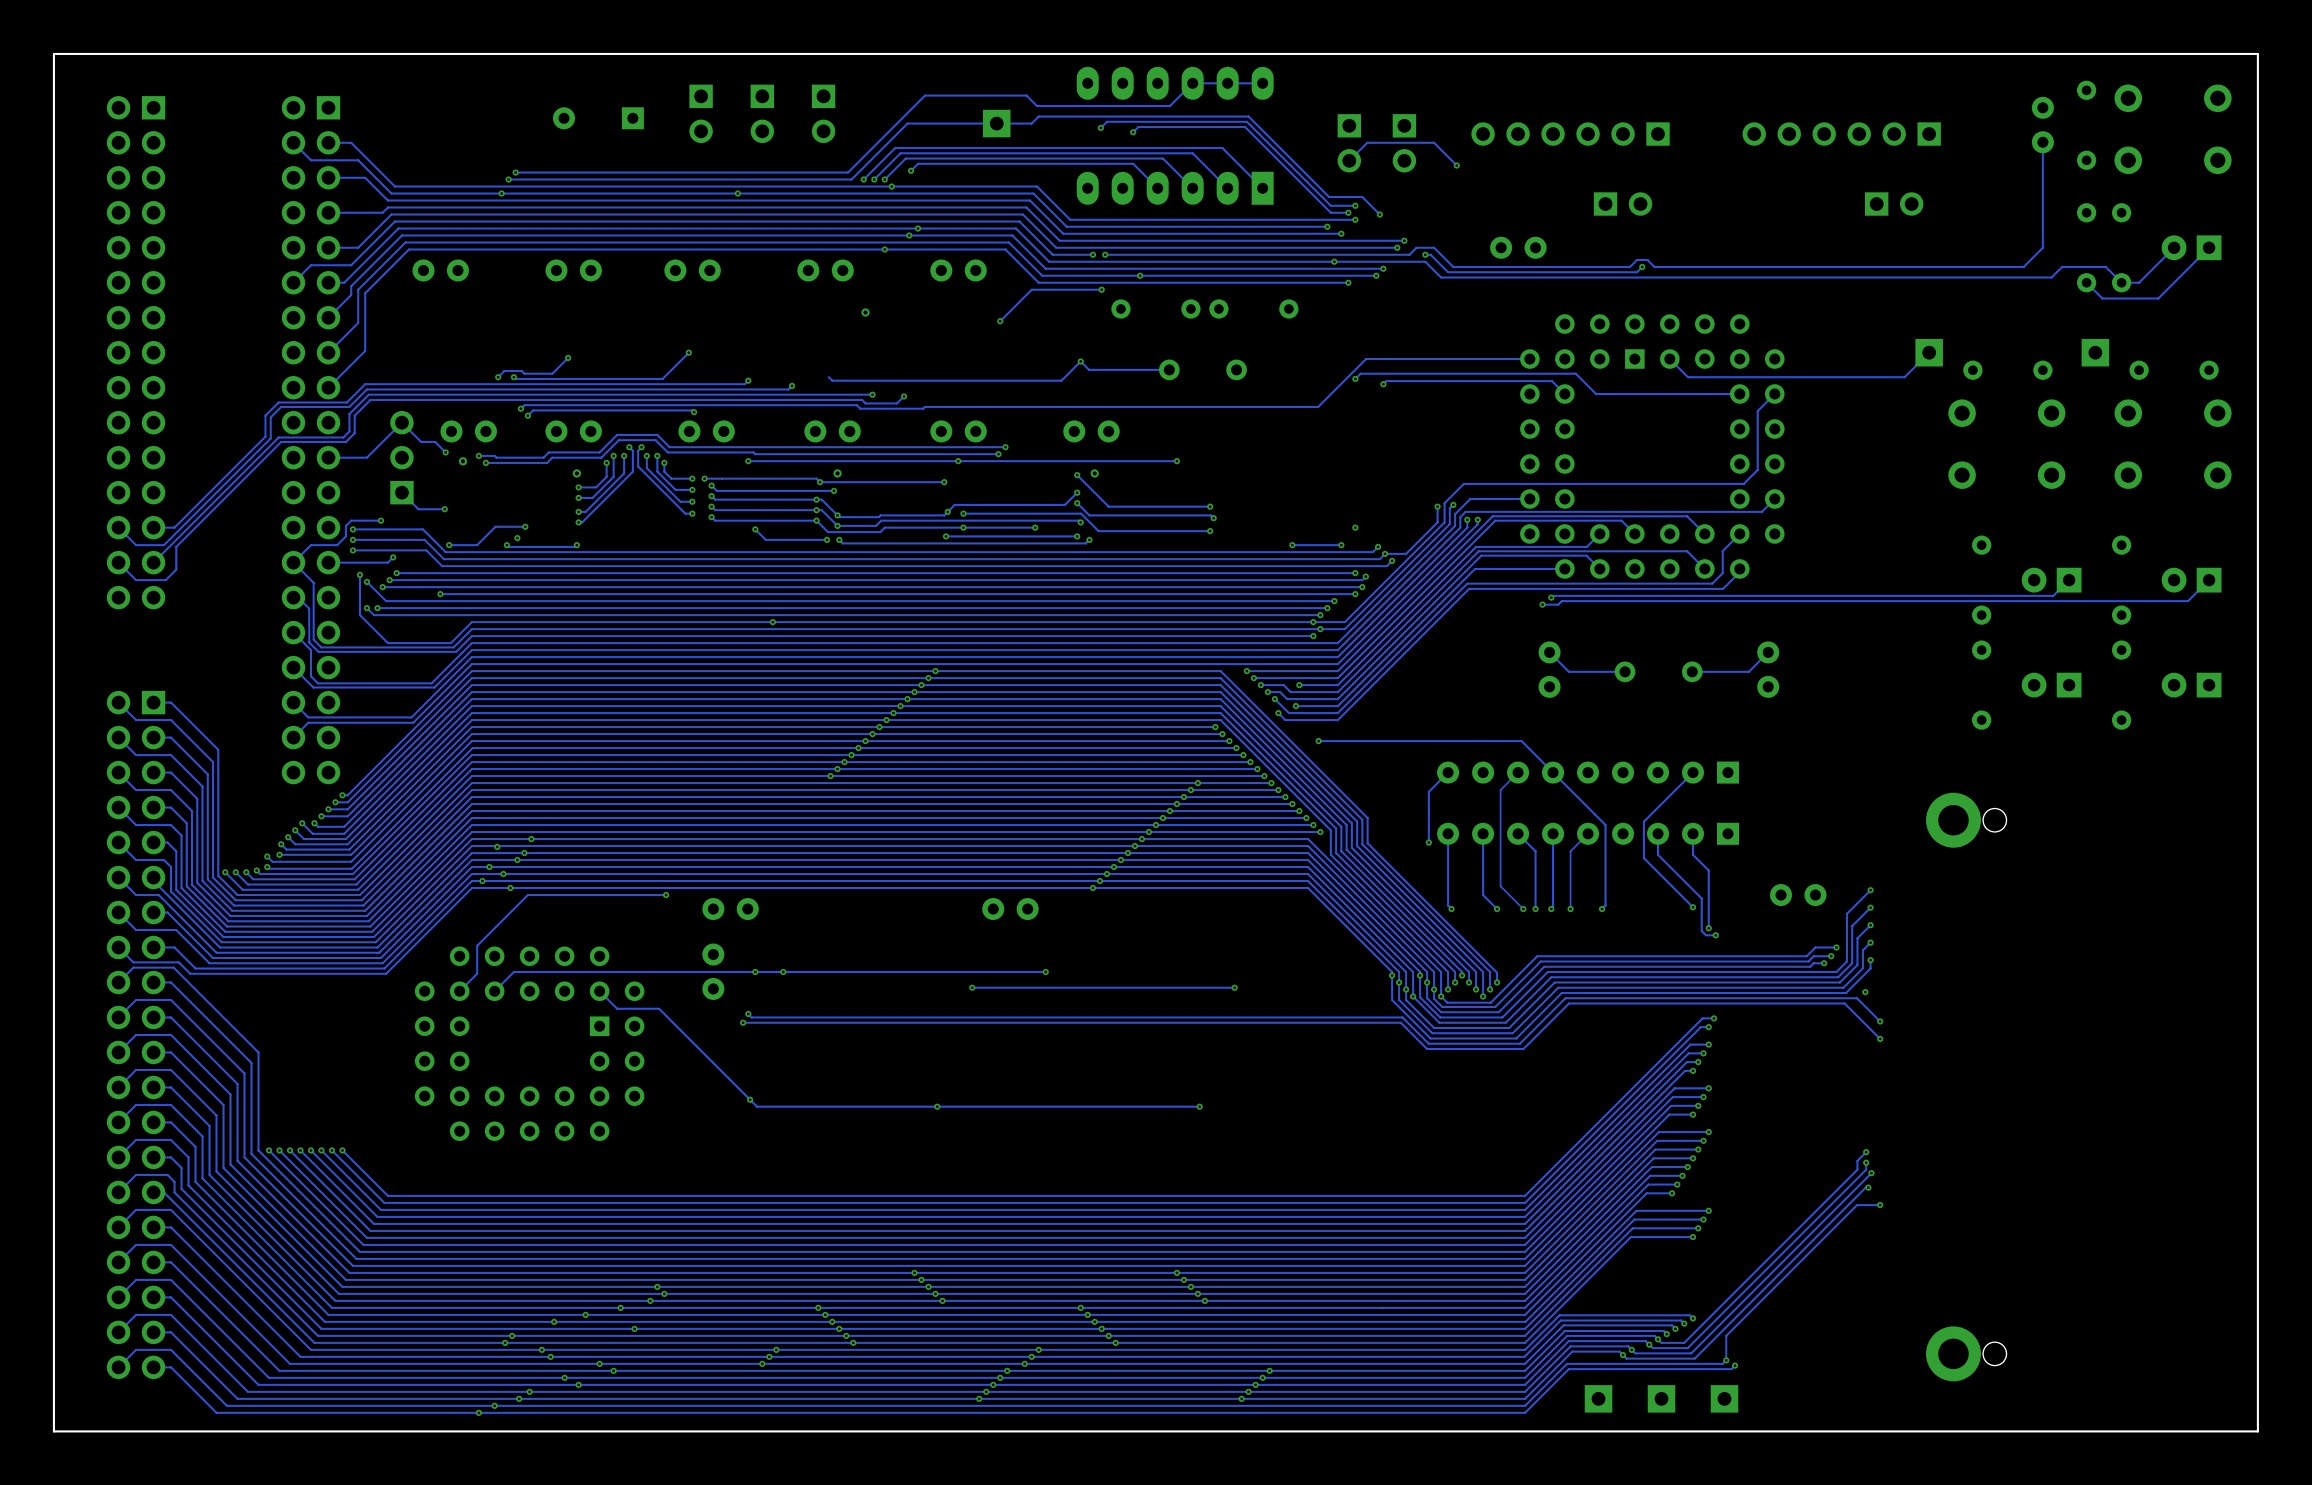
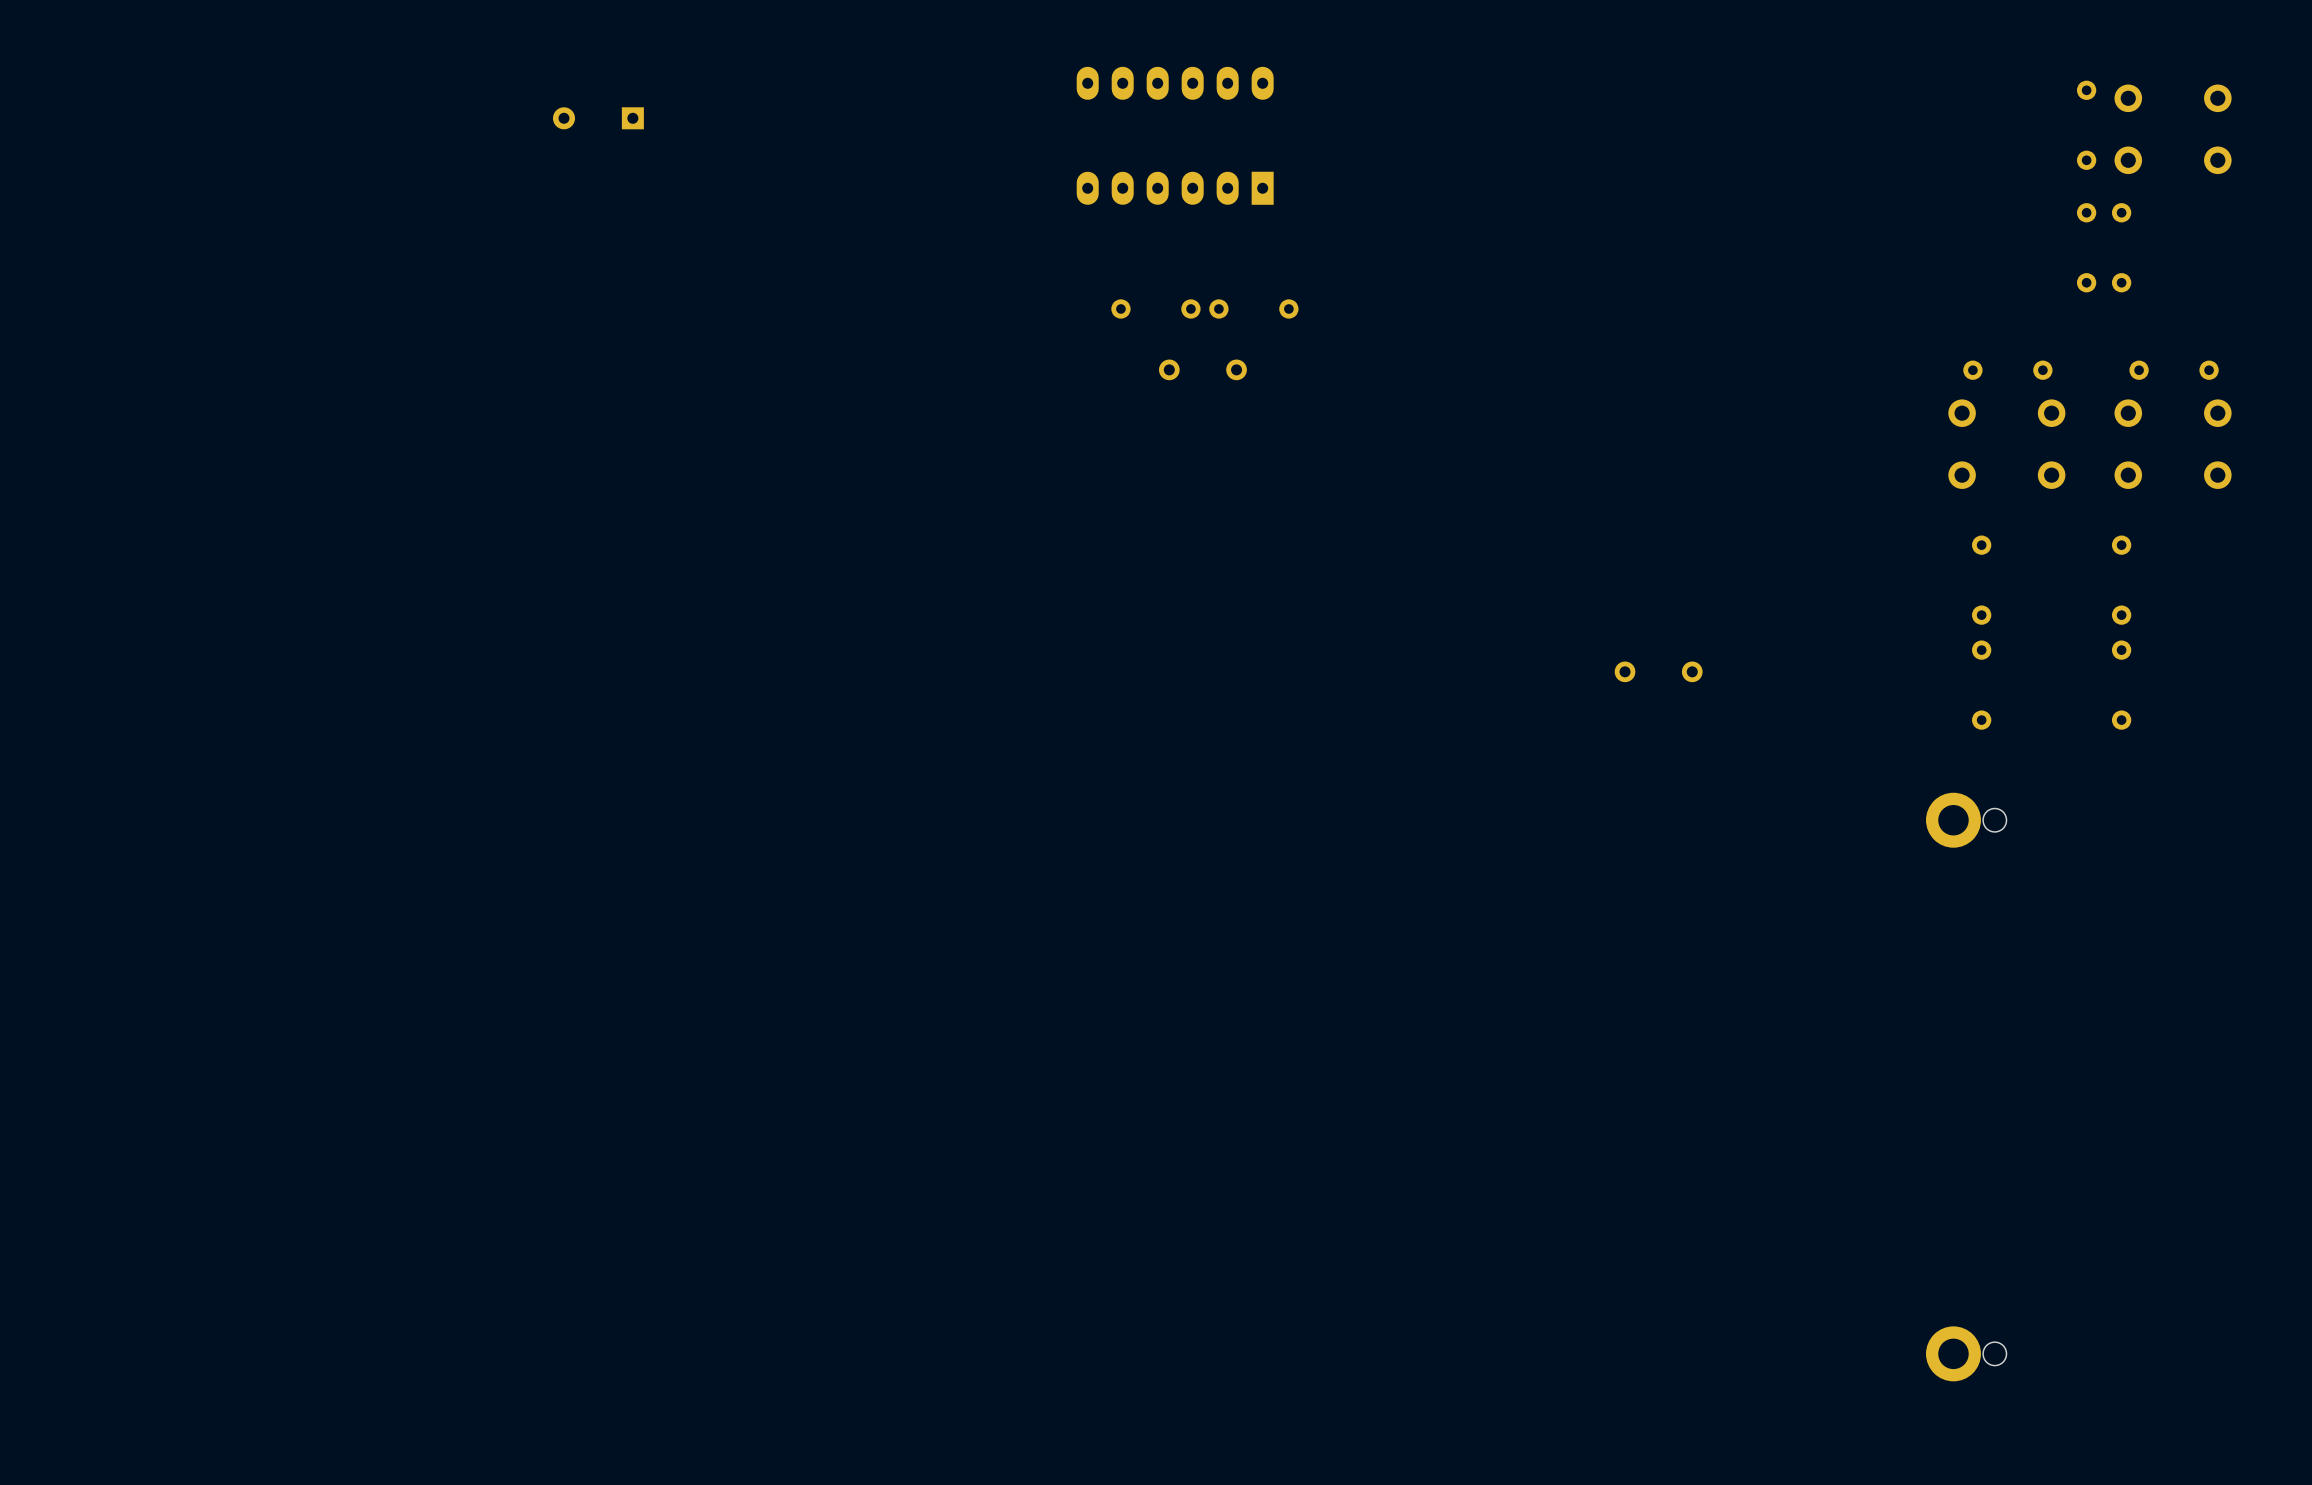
board edge: (2257, 53) (2257, 1431) (53, 1431) (53, 53) (2257, 53) -> none
track: (1262, 83) (1192, 83) (1169, 106) (1036, 106) (1026, 95) (925, 95) (848, 172) (515, 172) -> none
part: (701, 113) -> none
part: (762, 113) -> none
part: (823, 113) -> none
part: (996, 123) -> none
part: (2042, 125) -> none
track: (1100, 127) (1106, 121) (1246, 121) (1330, 205) (1355, 205) -> none
via: (1100, 127) -> none
track: (1133, 132) (1138, 127) (1245, 127) (1330, 212) (1348, 212) -> none
via: (1133, 132) -> none
part: (1570, 134) -> none
part: (1841, 134) -> none
track: (293, 142) (310, 160) (358, 160) (391, 193) (1033, 193) (1066, 226) (1327, 226) -> none
track: (328, 142) (351, 142) (394, 186) (1036, 186) (1070, 219) (1355, 219) -> none
track: (2042, 142) (2042, 247) (2023, 267) (1654, 267) (1647, 260) (1637, 260) (1630, 267) (1453, 267) (1434, 247) (1416, 247) (1409, 254) (1105, 254) -> none
part: (1349, 143) -> none
part: (1404, 143) -> none
track: (1349, 160) (1367, 142) (1434, 142) (1456, 165) -> none
via: (1456, 165) -> none
track: (911, 170) (918, 163) (1133, 163) (1157, 188) -> none
via: (911, 170) -> none
via: (515, 172) -> none
track: (328, 177) (365, 177) (387, 200) (1029, 200) (1063, 233) (1341, 233) -> none
track: (508, 179) (851, 179) (907, 123) (1031, 123) (1038, 116) (1248, 116) (1329, 197) (1362, 197) (1379, 214) -> none
via: (508, 179) -> none
track: (863, 179) (895, 148) (1222, 148) (1262, 188) -> none
via: (863, 179) -> none
track: (874, 179) (900, 153) (1192, 153) (1227, 188) -> none
via: (874, 179) -> none
track: (884, 179) (905, 158) (1162, 158) (1192, 188) -> none
via: (884, 179) -> none
via: (891, 186) -> none
via: (501, 193) -> none
via: (737, 193) -> none
part: (1623, 204) -> none
part: (1894, 204) -> none
via: (1355, 205) -> none
track: (328, 212) (382, 212) (387, 207) (1026, 207) (1059, 240) (1404, 240) -> none
via: (1348, 212) -> none
via: (1379, 214) -> none
via: (1355, 219) -> none
via: (1327, 226) -> none
via: (918, 228) -> none
via: (1341, 233) -> none
via: (909, 235) -> none
via: (1404, 240) -> none
track: (1397, 247) (1056, 247) (1022, 214) (391, 214) (358, 247) (328, 247) -> none
via: (1397, 247) -> none
part: (1518, 247) -> none
track: (2174, 247) (2139, 282) (2121, 282) (2105, 267) (2062, 267) (2051, 277) (1441, 277) (1425, 261) (1049, 261) (1015, 228) (398, 228) (344, 282) (328, 282) -> none
part: (2191, 247) -> none
track: (2209, 247) (2158, 298) (2102, 298) (2086, 282) -> none
via: (884, 249) -> none
track: (1092, 254) (1052, 254) (1019, 221) (394, 221) (351, 265) (310, 265) (293, 282) -> none
via: (1092, 254) -> none
via: (1105, 254) -> none
track: (1425, 254) (1430, 254) (1448, 272) (1637, 272) (1642, 267) -> none
via: (1425, 254) -> none
via: (1334, 261) -> none
via: (1642, 267) -> none
track: (1383, 268) (1045, 268) (1012, 235) (401, 235) (351, 286) (351, 294) (328, 317) -> none
via: (1383, 268) -> none
part: (440, 270) -> none
part: (573, 270) -> none
part: (692, 270) -> none
part: (825, 270) -> none
part: (958, 270) -> none
via: (1140, 275) -> none
track: (1376, 275) (1042, 275) (1008, 242) (405, 242) (358, 289) (358, 322) (328, 352) -> none
via: (1376, 275) -> none
track: (1348, 282) (1038, 282) (1005, 249) (408, 249) (365, 293) (365, 350) (328, 387) -> none
via: (1348, 282) -> none
track: (1101, 289) (1031, 289) (1000, 321) -> none
via: (1101, 289) -> none
via: (865, 312) -> none
via: (1000, 321) -> none
part: (136, 352) -> none
track: (688, 352) (662, 378) (515, 378) (513, 377) -> none
via: (688, 352) -> none
track: (1929, 352) (1904, 377) (1688, 377) (1669, 359) -> none
part: (1929, 352) -> none
part: (2095, 352) -> none
track: (568, 357) (552, 373) (524, 373) (521, 371) (504, 371) (498, 377) -> none
via: (568, 357) -> none
track: (1529, 359) (1366, 359) (1318, 406) (925, 406) (923, 408) (860, 408) (856, 405) (524, 405) (520, 408) -> none
via: (1080, 361) -> none
track: (1169, 369) (1089, 369) (1080, 361) (1061, 380) (832, 380) (828, 377) -> none
via: (498, 377) -> none
via: (513, 377) -> none
track: (1355, 378) (1360, 373) (1575, 373) (1596, 394) (1739, 394) -> none
via: (1355, 378) -> none
track: (748, 380) (744, 384) (365, 384) (346, 402) (278, 402) (265, 415) (265, 436) (174, 527) (153, 527) -> none
via: (748, 380) -> none
track: (1383, 384) (1386, 381) (1551, 381) (1564, 394) -> none
via: (1383, 384) -> none
track: (792, 385) (788, 389) (366, 389) (349, 406) (281, 406) (270, 417) (270, 438) (164, 545) (136, 545) (118, 527) -> none
via: (792, 385) -> none
track: (872, 394) (368, 394) (349, 413) (349, 431) (343, 437) (278, 437) (153, 562) -> none
via: (872, 394) -> none
track: (1774, 394) (1757, 411) (1757, 469) (1743, 483) (1463, 483) (1444, 503) (1444, 522) (1344, 622) (471, 622) (450, 643) (387, 643) (359, 615) (359, 574) -> none
track: (904, 396) (897, 403) (865, 403) (862, 399) (370, 399) (354, 415) (354, 433) (345, 441) (281, 441) (176, 546) (176, 569) (165, 580) (136, 580) (118, 562) -> none
via: (904, 396) -> none
via: (520, 408) -> none
track: (694, 412) (692, 410) (533, 410) (527, 415) -> none
via: (694, 412) -> none
via: (527, 415) -> none
part: (468, 431) -> none
part: (573, 431) -> none
part: (706, 431) -> none
part: (832, 431) -> none
part: (958, 431) -> none
part: (1091, 431) -> none
part: (310, 440) -> none
part: (1652, 446) -> none
track: (629, 447) (632, 450) (632, 471) (582, 522) (578, 522) -> none
via: (629, 447) -> none
track: (641, 447) (638, 450) (638, 466) (685, 513) (692, 513) -> none
via: (641, 447) -> none
track: (1005, 447) (669, 447) (657, 434) (617, 434) (599, 452) (548, 452) (543, 457) (478, 455) -> none
via: (1005, 447) -> none
track: (445, 452) (435, 441) (421, 441) (401, 422) (366, 457) (328, 457) -> none
via: (445, 452) -> none
track: (998, 454) (667, 452) (655, 440) (618, 440) (601, 457) (552, 457) (547, 462) (485, 462) -> none
via: (998, 454) -> none
via: (478, 455) -> none
track: (613, 455) (613, 476) (592, 497) (578, 497) -> none
via: (613, 455) -> none
track: (624, 455) (624, 473) (585, 511) (578, 511) -> none
via: (624, 455) -> none
track: (646, 455) (646, 468) (680, 501) (692, 501) -> none
via: (646, 455) -> none
track: (657, 455) (657, 471) (675, 489) (692, 489) -> none
via: (657, 455) -> none
part: (401, 457) -> none
via: (463, 461) -> none
via: (748, 461) -> none
via: (958, 461) -> none
track: (1176, 461) (748, 461) -> none
via: (1176, 461) -> none
via: (485, 462) -> none
track: (606, 462) (606, 476) (596, 487) (578, 487) -> none
via: (606, 462) -> none
track: (664, 462) (664, 471) (671, 478) (692, 478) -> none
via: (664, 462) -> none
via: (576, 473) -> none
via: (837, 473) -> none
via: (1094, 473) -> none
track: (1077, 475) (1108, 506) (1210, 506) -> none
via: (1077, 475) -> none
via: (692, 478) -> none
track: (704, 478) (816, 478) (820, 482) (944, 482) -> none
via: (704, 478) -> none
via: (820, 482) -> none
via: (944, 482) -> none
track: (711, 485) (716, 490) (834, 490) -> none
via: (711, 485) -> none
via: (578, 487) -> none
via: (692, 489) -> none
via: (834, 490) -> none
track: (401, 492) (418, 509) (444, 509) -> none
track: (1077, 492) (1064, 504) (954, 504) (944, 515) (880, 515) (878, 517) (839, 517) (821, 499) (715, 499) (711, 496) -> none
via: (1077, 492) -> none
via: (711, 496) -> none
via: (578, 497) -> none
track: (1529, 498) (1470, 498) (1455, 514) (1455, 525) (1337, 643) (471, 643) (431, 683) (317, 683) (310, 676) (310, 650) (293, 632) -> none
track: (1774, 498) (1761, 511) (1465, 511) (1460, 517) (1460, 527) (1337, 650) (471, 650) (434, 687) (313, 687) (293, 667) -> none
via: (816, 499) -> none
via: (692, 501) -> none
track: (1077, 503) (1089, 515) (1210, 515) (1213, 518) -> none
via: (1077, 503) -> none
track: (1453, 504) (1449, 508) (1449, 524) (1344, 629) (471, 629) (453, 647) (321, 647) (313, 639) (313, 582) (293, 562) (310, 545) (337, 545) (345, 536) (345, 525) (351, 520) (380, 520) -> none
via: (1453, 504) -> none
track: (711, 506) (715, 510) (821, 510) (837, 525) (876, 525) (881, 520) (1078, 520) (1080, 522) -> none
via: (711, 506) -> none
via: (1210, 506) -> none
track: (1437, 506) (1437, 522) (1406, 553) (1385, 553) (1379, 559) (443, 559) (424, 539) (352, 539) -> none
via: (1437, 506) -> none
via: (444, 509) -> none
via: (816, 510) -> none
via: (578, 511) -> none
via: (947, 511) -> none
via: (692, 513) -> none
track: (963, 513) (1081, 513) (1098, 531) (1210, 531) -> none
via: (963, 513) -> none
via: (837, 515) -> none
track: (711, 517) (715, 520) (816, 520) (828, 532) (880, 532) (884, 527) (1035, 527) -> none
via: (711, 517) -> none
via: (1213, 518) -> none
track: (1467, 519) (1467, 527) (1337, 657) (471, 657) (411, 717) (308, 717) (293, 702) -> none
via: (1467, 519) -> none
track: (1477, 519) (1477, 524) (1337, 664) (471, 664) (413, 722) (308, 722) (293, 737) -> none
via: (1477, 519) -> none
via: (380, 520) -> none
via: (816, 520) -> none
via: (578, 522) -> none
via: (1080, 522) -> none
via: (837, 525) -> none
track: (525, 526) (495, 526) (477, 545) (449, 545) -> none
via: (525, 526) -> none
via: (963, 527) -> none
via: (1035, 527) -> none
via: (1355, 527) -> none
track: (352, 529) (422, 529) (445, 552) (1372, 552) (1378, 546) -> none
via: (352, 529) -> none
track: (755, 529) (765, 539) (827, 539) -> none
via: (755, 529) -> none
via: (1210, 531) -> none
track: (1599, 533) (1586, 546) (1476, 546) (1337, 685) (1299, 685) -> none
track: (1634, 533) (1621, 520) (1495, 520) (1337, 678) (1253, 678) -> none
track: (1704, 533) (1687, 516) (1492, 516) (1337, 671) (1246, 671) -> none
track: (1739, 533) (1722, 551) (1722, 573) (1712, 583) (1467, 583) (1337, 713) (1288, 713) (1274, 699) -> none
via: (946, 536) -> none
track: (1077, 536) (946, 536) -> none
via: (1077, 536) -> none
via: (517, 538) -> none
via: (352, 539) -> none
via: (827, 539) -> none
via: (839, 539) -> none
track: (1089, 539) (1085, 543) (842, 543) (839, 539) -> none
via: (1089, 539) -> none
via: (449, 545) -> none
via: (506, 545) -> none
track: (576, 545) (575, 546) (508, 546) (506, 545) -> none
via: (576, 545) -> none
via: (1292, 545) -> none
track: (1341, 545) (1292, 545) -> none
via: (1341, 545) -> none
via: (1378, 546) -> none
track: (352, 550) (426, 550) (442, 566) (1386, 566) (1392, 560) -> none
via: (352, 550) -> none
via: (1385, 553) -> none
track: (393, 557) (387, 562) (328, 562) -> none
via: (393, 557) -> none
via: (1392, 560) -> none
track: (1564, 568) (1475, 568) (1337, 706) (1295, 706) -> none
track: (1599, 568) (1586, 555) (1481, 555) (1337, 699) (1287, 699) (1280, 692) (1267, 692) -> none
track: (1704, 568) (1687, 551) (1478, 551) (1337, 692) (1290, 692) (1283, 685) (1260, 685) -> none
track: (1739, 568) (1739, 572) (1723, 588) (1469, 588) (1337, 720) (1285, 720) (1278, 713) -> none
via: (396, 573) -> none
track: (1355, 573) (396, 573) -> none
via: (1355, 573) -> none
via: (359, 574) -> none
track: (1365, 576) (1362, 580) (389, 580) -> none
via: (1365, 576) -> none
via: (389, 580) -> none
part: (2051, 580) -> none
track: (2069, 580) (2053, 595) (1553, 595) (1551, 597) -> none
part: (2191, 580) -> none
track: (2209, 580) (2188, 601) (1561, 601) (1558, 604) (1542, 604) -> none
track: (366, 581) (386, 601) (1334, 601) -> none
via: (366, 581) -> none
via: (382, 587) -> none
track: (1362, 587) (382, 587) -> none
via: (1362, 587) -> none
via: (440, 594) -> none
track: (1355, 594) (440, 594) -> none
via: (1355, 594) -> none
track: (293, 597) (298, 597) (309, 608) (309, 642) (318, 651) (456, 651) (471, 636) (1313, 636) -> none
via: (1551, 597) -> none
via: (1334, 601) -> none
via: (1542, 604) -> none
track: (366, 608) (373, 615) (1320, 615) -> none
via: (366, 608) -> none
via: (377, 608) -> none
track: (1327, 608) (377, 608) -> none
via: (1327, 608) -> none
via: (1320, 615) -> none
via: (772, 622) -> none
via: (1313, 622) -> none
via: (1320, 629) -> none
via: (1313, 636) -> none
track: (1549, 652) (1568, 671) (1625, 671) -> none
track: (1768, 652) (1748, 671) (1692, 671) -> none
part: (1549, 669) -> none
part: (1768, 669) -> none
via: (935, 671) -> none
via: (1246, 671) -> none
via: (928, 678) -> none
via: (1253, 678) -> none
via: (921, 685) -> none
via: (1260, 685) -> none
via: (1299, 685) -> none
part: (2051, 685) -> none
part: (2191, 685) -> none
via: (914, 692) -> none
via: (1267, 692) -> none
via: (907, 699) -> none
via: (1274, 699) -> none
track: (118, 702) (136, 720) (171, 720) (213, 762) (213, 877) (235, 900) (361, 900) (471, 790) (1278, 790) -> none
track: (153, 702) (171, 702) (218, 749) (218, 875) (237, 895) (359, 895) (471, 783) (1271, 783) -> none
via: (900, 706) -> none
via: (1295, 706) -> none
via: (893, 713) -> none
via: (1278, 713) -> none
via: (886, 720) -> none
via: (879, 727) -> none
track: (1215, 727) (471, 727) (349, 849) (286, 849) (281, 844) -> none
via: (1215, 727) -> none
via: (872, 734) -> none
track: (1222, 734) (471, 734) (351, 854) (279, 854) -> none
via: (1222, 734) -> none
track: (118, 737) (136, 755) (171, 755) (202, 786) (202, 881) (232, 910) (365, 910) (471, 804) (1292, 804) -> none
track: (153, 737) (171, 737) (207, 774) (207, 879) (234, 905) (363, 905) (471, 797) (1285, 797) -> none
via: (865, 741) -> none
track: (1229, 741) (471, 741) (351, 861) (272, 861) (267, 856) -> none
via: (1229, 741) -> none
track: (1318, 741) (1521, 741) (1605, 825) (1605, 905) (1602, 909) -> none
via: (1318, 741) -> none
via: (858, 748) -> none
track: (1236, 748) (472, 748) (351, 868) (268, 868) (267, 867) -> none
via: (1236, 748) -> none
via: (851, 755) -> none
track: (1243, 755) (471, 755) (352, 874) (260, 874) (256, 870) -> none
via: (1243, 755) -> none
via: (844, 762) -> none
track: (1250, 762) (471, 762) (354, 879) (253, 879) (246, 872) -> none
via: (1250, 762) -> none
via: (837, 769) -> none
track: (1257, 769) (471, 769) (356, 884) (248, 884) (235, 872) -> none
via: (1257, 769) -> none
track: (118, 772) (136, 790) (171, 790) (192, 811) (192, 884) (228, 921) (368, 921) (471, 818) (1306, 818) -> none
track: (153, 772) (171, 772) (197, 798) (197, 882) (230, 916) (366, 916) (471, 811) (1299, 811) -> none
track: (1448, 772) (1428, 791) (1428, 842) -> none
track: (1518, 772) (1500, 790) (1500, 886) (1523, 909) -> none
part: (1588, 772) -> none
track: (1693, 772) (1643, 821) (1643, 858) (1693, 907) -> none
via: (830, 776) -> none
track: (1264, 776) (471, 776) (358, 889) (242, 889) (225, 872) -> none
via: (1264, 776) -> none
via: (1197, 783) -> none
via: (1271, 783) -> none
via: (1190, 790) -> none
via: (1278, 790) -> none
track: (342, 795) (347, 795) (471, 671) (1220, 671) (1367, 818) (1367, 843) (1497, 972) (1497, 982) -> none
via: (342, 795) -> none
via: (1183, 797) -> none
via: (1285, 797) -> none
track: (335, 802) (347, 802) (471, 678) (1220, 678) (1362, 819) (1362, 844) (1490, 972) (1490, 989) -> none
via: (335, 802) -> none
via: (1176, 804) -> none
via: (1292, 804) -> none
track: (118, 807) (136, 825) (171, 825) (181, 835) (181, 888) (225, 931) (372, 931) (471, 832) (1320, 832) -> none
track: (153, 807) (171, 807) (186, 823) (186, 886) (227, 926) (370, 926) (471, 825) (1313, 825) -> none
track: (328, 809) (347, 809) (471, 685) (1220, 685) (1357, 821) (1357, 846) (1483, 972) (1483, 996) -> none
via: (328, 809) -> none
via: (1169, 811) -> none
via: (1299, 811) -> none
track: (321, 816) (347, 816) (471, 692) (1220, 692) (1351, 823) (1351, 847) (1476, 972) (1476, 989) -> none
via: (321, 816) -> none
via: (1162, 818) -> none
via: (1306, 818) -> none
track: (302, 823) (312, 833) (344, 833) (471, 706) (1220, 706) (1341, 826) (1341, 851) (1462, 972) (1462, 975) -> none
via: (302, 823) -> none
track: (314, 823) (317, 826) (344, 826) (471, 699) (1220, 699) (1346, 825) (1346, 849) (1469, 972) (1469, 982) -> none
via: (314, 823) -> none
via: (1155, 825) -> none
via: (1313, 825) -> none
track: (295, 830) (303, 839) (345, 839) (471, 713) (1220, 713) (1336, 828) (1336, 853) (1455, 972) (1455, 982) -> none
via: (295, 830) -> none
via: (1148, 832) -> none
via: (1320, 832) -> none
track: (1448, 833) (1448, 905) (1451, 909) -> none
track: (1483, 833) (1483, 895) (1497, 909) -> none
track: (1518, 833) (1535, 851) (1535, 909) -> none
track: (1553, 833) (1553, 907) (1551, 909) -> none
track: (1588, 833) (1570, 851) (1570, 909) -> none
part: (1588, 833) -> none
track: (1658, 833) (1658, 854) (1701, 898) (1701, 931) (1705, 935) (1715, 935) -> none
track: (1693, 833) (1693, 854) (1708, 870) (1708, 928) -> none
track: (288, 837) (295, 844) (347, 844) (471, 720) (1220, 720) (1330, 830) (1330, 854) (1448, 972) (1448, 989) -> none
via: (288, 837) -> none
via: (531, 839) -> none
via: (1141, 839) -> none
track: (118, 842) (136, 860) (164, 860) (171, 867) (171, 891) (221, 942) (375, 942) (471, 846) (1308, 846) (1434, 972) (1434, 998) (1442, 1006) (1495, 1006) (1540, 961) (1808, 961) (1813, 956) (1831, 956) -> none
track: (153, 842) (167, 842) (176, 851) (176, 889) (223, 937) (373, 937) (471, 839) (1308, 839) (1441, 972) (1441, 996) (1447, 1002) (1490, 1002) (1537, 956) (1806, 956) (1815, 947) (1836, 947) -> none
via: (1428, 842) -> none
via: (281, 844) -> none
via: (497, 846) -> none
via: (1134, 846) -> none
track: (500, 853) (1308, 853) (1427, 972) (1427, 998) (1441, 1012) (1498, 1012) (1544, 966) (1810, 966) (1813, 963) (1824, 963) -> none
track: (500, 853) (471, 853) (377, 947) (220, 947) (153, 881) (153, 877) -> none
via: (524, 853) -> none
via: (1127, 853) -> none
via: (279, 854) -> none
via: (267, 856) -> none
via: (517, 860) -> none
via: (1120, 860) -> none
via: (267, 867) -> none
via: (489, 867) -> none
via: (1113, 867) -> none
via: (256, 870) -> none
via: (225, 872) -> none
via: (235, 872) -> none
via: (246, 872) -> none
via: (503, 874) -> none
via: (1106, 874) -> none
track: (118, 877) (136, 895) (158, 895) (216, 952) (379, 952) (471, 860) (1308, 860) (1420, 972) (1420, 997) (1440, 1017) (1502, 1017) (1547, 972) (1836, 972) (1846, 961) (1846, 913) (1870, 890) -> none
via: (482, 881) -> none
via: (1099, 881) -> none
via: (510, 888) -> none
via: (1092, 888) -> none
via: (1870, 890) -> none
track: (666, 895) (527, 895) (477, 945) (477, 973) (459, 991) -> none
via: (666, 895) -> none
part: (1798, 895) -> none
via: (1693, 907) -> none
track: (1870, 907) (1852, 926) (1852, 963) (1838, 977) (1551, 977) (1505, 1022) (1439, 1022) (1413, 996) (1413, 972) (1308, 867) (471, 867) (380, 958) (213, 958) (167, 912) (153, 912) -> none
via: (1870, 907) -> none
part: (730, 909) -> none
part: (1010, 909) -> none
via: (1451, 909) -> none
via: (1497, 909) -> none
via: (1523, 909) -> none
via: (1535, 909) -> none
via: (1551, 909) -> none
via: (1570, 909) -> none
via: (1602, 909) -> none
track: (118, 912) (136, 930) (176, 930) (209, 963) (382, 963) (471, 874) (1308, 874) (1406, 972) (1406, 999) (1434, 1027) (1509, 1027) (1554, 982) (1839, 982) (1857, 965) (1857, 938) (1870, 925) -> none
via: (1870, 925) -> none
via: (1708, 928) -> none
via: (1715, 935) -> none
track: (1870, 942) (1862, 950) (1862, 968) (1843, 987) (1558, 987) (1512, 1033) (1432, 1033) (1399, 999) (1399, 972) (1308, 881) (471, 881) (384, 968) (195, 968) (174, 947) (153, 947) -> none
via: (1870, 942) -> none
track: (118, 947) (133, 962) (178, 962) (190, 973) (386, 973) (471, 888) (1308, 888) (1392, 972) (1392, 999) (1430, 1038) (1516, 1038) (1561, 992) (1846, 992) (1870, 968) (1870, 960) -> none
via: (1836, 947) -> none
via: (1831, 956) -> none
via: (1870, 960) -> none
via: (1824, 963) -> none
part: (713, 971) -> none
via: (755, 972) -> none
via: (783, 972) -> none
track: (1045, 972) (513, 972) (494, 991) -> none
via: (1045, 972) -> none
via: (1392, 975) -> none
via: (1420, 975) -> none
via: (1462, 975) -> none
track: (118, 982) (133, 967) (173, 967) (258, 1052) (258, 1150) (359, 1251) (1525, 1251) (1671, 1105) (1698, 1105) -> none
track: (153, 982) (171, 982) (251, 1062) (251, 1153) (356, 1258) (1525, 1258) (1669, 1114) (1693, 1114) -> none
via: (1399, 982) -> none
via: (1427, 982) -> none
via: (1455, 982) -> none
via: (1469, 982) -> none
via: (1497, 982) -> none
via: (972, 987) -> none
track: (1234, 987) (972, 987) -> none
via: (1234, 987) -> none
via: (1406, 989) -> none
via: (1434, 989) -> none
via: (1448, 989) -> none
via: (1476, 989) -> none
via: (1490, 989) -> none
track: (599, 991) (617, 1008) (659, 1008) (757, 1106) (1199, 1106) -> none
via: (1865, 992) -> none
via: (1413, 996) -> none
via: (1441, 996) -> none
via: (1483, 996) -> none
track: (748, 1013) (751, 1017) (1402, 1017) (1428, 1043) (1519, 1043) (1565, 998) (1856, 998) (1880, 1021) -> none
via: (748, 1013) -> none
track: (118, 1017) (136, 999) (171, 999) (244, 1073) (244, 1157) (352, 1265) (1525, 1265) (1658, 1132) (1708, 1132) -> none
track: (153, 1017) (171, 1017) (237, 1083) (237, 1160) (349, 1272) (1525, 1272) (1657, 1140) (1703, 1140) -> none
track: (1713, 1018) (1702, 1018) (1525, 1195) (387, 1195) (342, 1150) -> none
via: (1713, 1018) -> none
via: (1880, 1021) -> none
track: (743, 1022) (1400, 1022) (1427, 1048) (1523, 1048) (1568, 1003) (1844, 1003) (1880, 1038) -> none
via: (743, 1022) -> none
track: (1708, 1027) (1700, 1027) (1525, 1202) (384, 1202) (331, 1150) -> none
via: (1708, 1027) -> none
part: (136, 1034) -> none
via: (1880, 1038) -> none
part: (529, 1043) -> none
track: (1708, 1044) (1690, 1044) (1525, 1209) (380, 1209) (321, 1150) -> none
via: (1708, 1044) -> none
track: (118, 1052) (136, 1034) (171, 1034) (230, 1094) (230, 1164) (345, 1279) (1525, 1279) (1655, 1149) (1698, 1149) -> none
track: (153, 1052) (171, 1052) (223, 1104) (223, 1167) (342, 1286) (1525, 1286) (1653, 1158) (1693, 1158) -> none
track: (1703, 1053) (1688, 1053) (1525, 1216) (377, 1216) (310, 1150) -> none
via: (1703, 1053) -> none
track: (1698, 1062) (1686, 1062) (1525, 1223) (373, 1223) (300, 1150) -> none
via: (1698, 1062) -> none
track: (1693, 1070) (1685, 1070) (1525, 1230) (370, 1230) (289, 1150) -> none
via: (1693, 1070) -> none
track: (118, 1087) (136, 1069) (171, 1069) (216, 1115) (216, 1171) (338, 1293) (1525, 1293) (1651, 1167) (1687, 1167) -> none
track: (153, 1087) (171, 1087) (209, 1125) (209, 1174) (335, 1300) (1525, 1300) (1650, 1175) (1682, 1175) -> none
track: (1708, 1088) (1674, 1088) (1525, 1237) (366, 1237) (279, 1150) -> none
via: (1708, 1088) -> none
track: (1703, 1097) (1672, 1097) (1525, 1244) (363, 1244) (268, 1150) -> none
via: (1703, 1097) -> none
via: (750, 1099) -> none
via: (1698, 1105) -> none
via: (937, 1106) -> none
via: (1199, 1106) -> none
via: (1693, 1114) -> none
track: (118, 1122) (136, 1104) (171, 1104) (202, 1136) (202, 1178) (331, 1307) (1525, 1307) (1648, 1184) (1677, 1184) -> none
track: (153, 1122) (171, 1122) (195, 1146) (195, 1181) (328, 1314) (1525, 1314) (1646, 1193) (1672, 1193) -> none
via: (1708, 1132) -> none
via: (1703, 1140) -> none
via: (1698, 1149) -> none
via: (268, 1150) -> none
via: (279, 1150) -> none
via: (289, 1150) -> none
via: (300, 1150) -> none
via: (310, 1150) -> none
via: (321, 1150) -> none
via: (331, 1150) -> none
via: (342, 1150) -> none
track: (1866, 1152) (1857, 1160) (1857, 1169) (1684, 1342) (1661, 1342) (1654, 1335) (1567, 1335) (1525, 1377) (268, 1377) (171, 1279) (136, 1279) (118, 1297) -> none
via: (1866, 1152) -> none
track: (118, 1157) (136, 1139) (171, 1139) (188, 1157) (188, 1185) (324, 1321) (1525, 1321) (1636, 1210) (1708, 1210) -> none
track: (153, 1157) (171, 1157) (181, 1167) (181, 1188) (321, 1328) (1525, 1328) (1634, 1219) (1703, 1219) -> none
via: (1693, 1158) -> none
track: (1866, 1162) (1866, 1169) (1687, 1348) (1652, 1348) (1645, 1341) (1568, 1341) (1525, 1384) (258, 1384) (171, 1297) (153, 1297) -> none
via: (1866, 1162) -> none
via: (1687, 1167) -> none
track: (1871, 1173) (1691, 1353) (1635, 1353) (1628, 1346) (1570, 1346) (1525, 1391) (248, 1391) (171, 1314) (136, 1314) (118, 1332) -> none
via: (1871, 1173) -> none
via: (1682, 1175) -> none
via: (1677, 1184) -> none
track: (1868, 1187) (1865, 1187) (1694, 1358) (1626, 1358) (1619, 1351) (1572, 1351) (1525, 1398) (237, 1398) (171, 1332) (153, 1332) -> none
via: (1868, 1187) -> none
track: (118, 1192) (136, 1174) (167, 1174) (174, 1181) (174, 1192) (317, 1335) (1525, 1335) (1632, 1228) (1698, 1228) -> none
track: (153, 1192) (164, 1192) (314, 1342) (1525, 1342) (1630, 1237) (1693, 1237) -> none
via: (1672, 1193) -> none
track: (1880, 1205) (1857, 1205) (1726, 1335) (1726, 1360) (1722, 1363) (1567, 1363) (1525, 1405) (227, 1405) (171, 1349) (136, 1349) (118, 1367) -> none
via: (1880, 1205) -> none
via: (1708, 1210) -> none
via: (1703, 1219) -> none
track: (118, 1227) (136, 1209) (171, 1209) (310, 1349) (1525, 1349) (1559, 1315) (1689, 1315) (1693, 1318) -> none
track: (153, 1227) (171, 1227) (300, 1356) (1524, 1356) (1560, 1320) (1681, 1320) (1684, 1323) -> none
via: (1698, 1228) -> none
via: (1693, 1237) -> none
track: (118, 1262) (136, 1244) (171, 1244) (289, 1363) (1525, 1363) (1563, 1325) (1672, 1325) (1675, 1328) -> none
track: (153, 1262) (171, 1262) (279, 1370) (1525, 1370) (1564, 1331) (1663, 1331) (1666, 1334) -> none
via: (914, 1272) -> none
via: (1176, 1272) -> none
via: (921, 1279) -> none
via: (1183, 1279) -> none
via: (657, 1286) -> none
via: (928, 1286) -> none
via: (1190, 1286) -> none
via: (664, 1293) -> none
via: (935, 1293) -> none
via: (1197, 1293) -> none
via: (650, 1300) -> none
via: (942, 1300) -> none
via: (1204, 1300) -> none
via: (620, 1307) -> none
via: (818, 1307) -> none
via: (1080, 1307) -> none
via: (585, 1314) -> none
via: (825, 1314) -> none
via: (1087, 1314) -> none
via: (1693, 1318) -> none
via: (554, 1321) -> none
via: (832, 1321) -> none
via: (1094, 1321) -> none
via: (1684, 1323) -> none
via: (634, 1328) -> none
via: (839, 1328) -> none
via: (1101, 1328) -> none
via: (1675, 1328) -> none
via: (1666, 1334) -> none
via: (512, 1335) -> none
via: (846, 1335) -> none
via: (1108, 1335) -> none
via: (1658, 1339) -> none
via: (505, 1342) -> none
via: (853, 1342) -> none
via: (1115, 1342) -> none
via: (1649, 1344) -> none
via: (541, 1349) -> none
via: (776, 1349) -> none
via: (1038, 1349) -> none
via: (1631, 1349) -> none
via: (1623, 1355) -> none
via: (550, 1356) -> none
via: (769, 1356) -> none
via: (1031, 1356) -> none
via: (1726, 1360) -> none
via: (599, 1363) -> none
via: (762, 1363) -> none
via: (1024, 1363) -> none
track: (1734, 1365) (1731, 1369) (1568, 1369) (1525, 1412) (216, 1412) (171, 1367) (153, 1367) -> none
via: (1734, 1365) -> none
via: (613, 1370) -> none
via: (1007, 1370) -> none
via: (1269, 1370) -> none
via: (564, 1377) -> none
via: (1000, 1377) -> none
via: (1262, 1377) -> none
via: (578, 1384) -> none
via: (993, 1384) -> none
via: (1255, 1384) -> none
via: (529, 1391) -> none
via: (986, 1391) -> none
via: (1248, 1391) -> none
via: (519, 1398) -> none
via: (979, 1398) -> none
via: (1241, 1398) -> none
part: (1598, 1398) -> none
part: (1661, 1398) -> none
part: (1724, 1398) -> none
via: (494, 1405) -> none
via: (478, 1412) -> none

